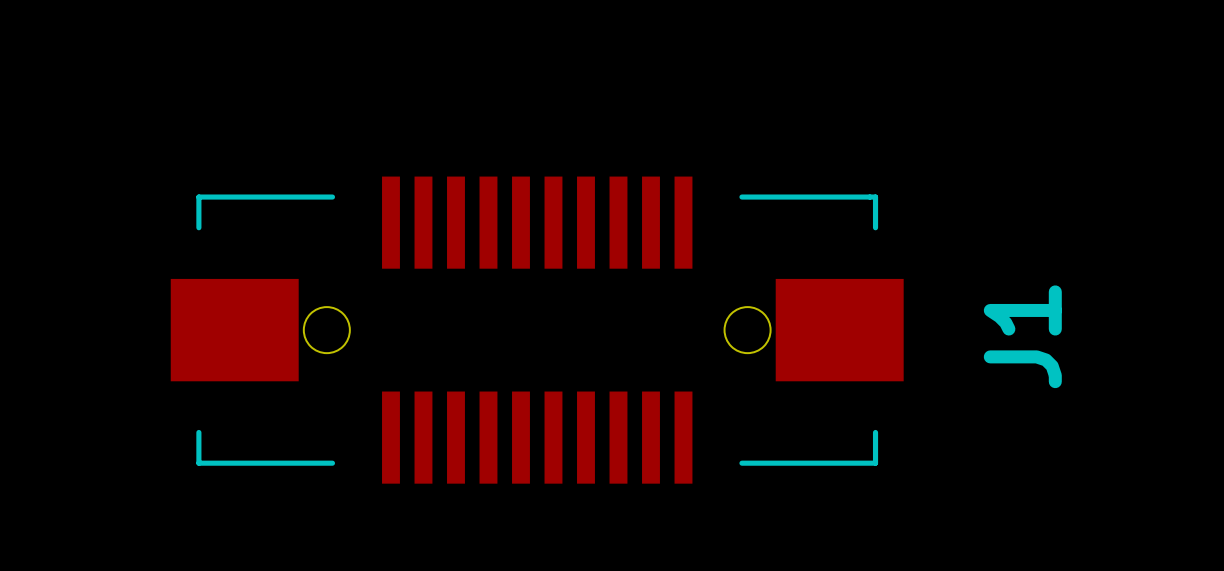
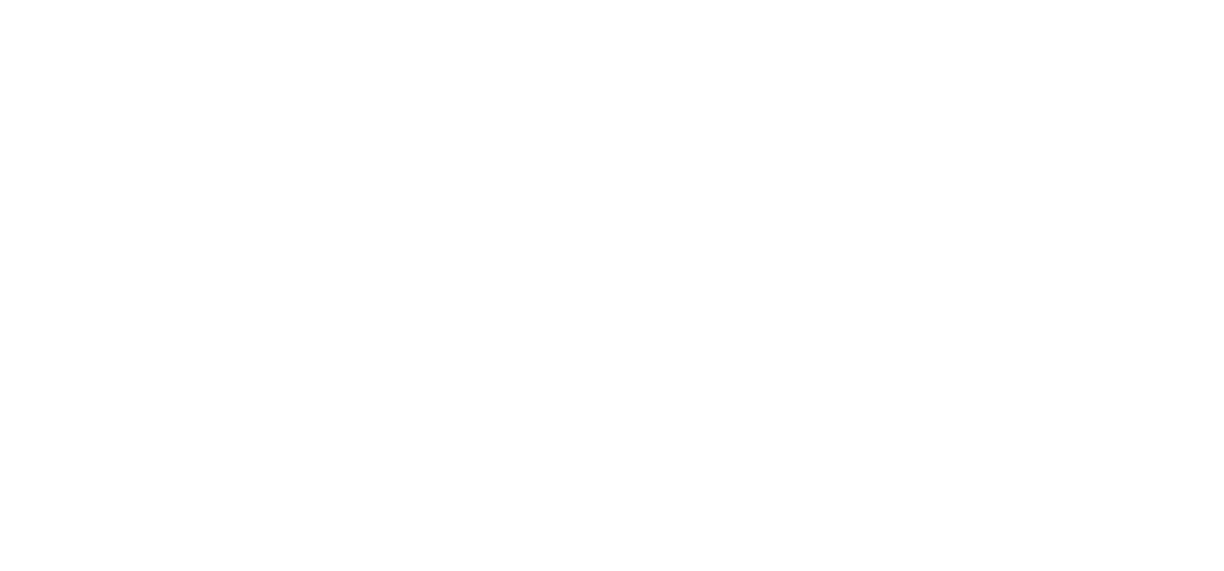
J1: (537, 330) -> none

